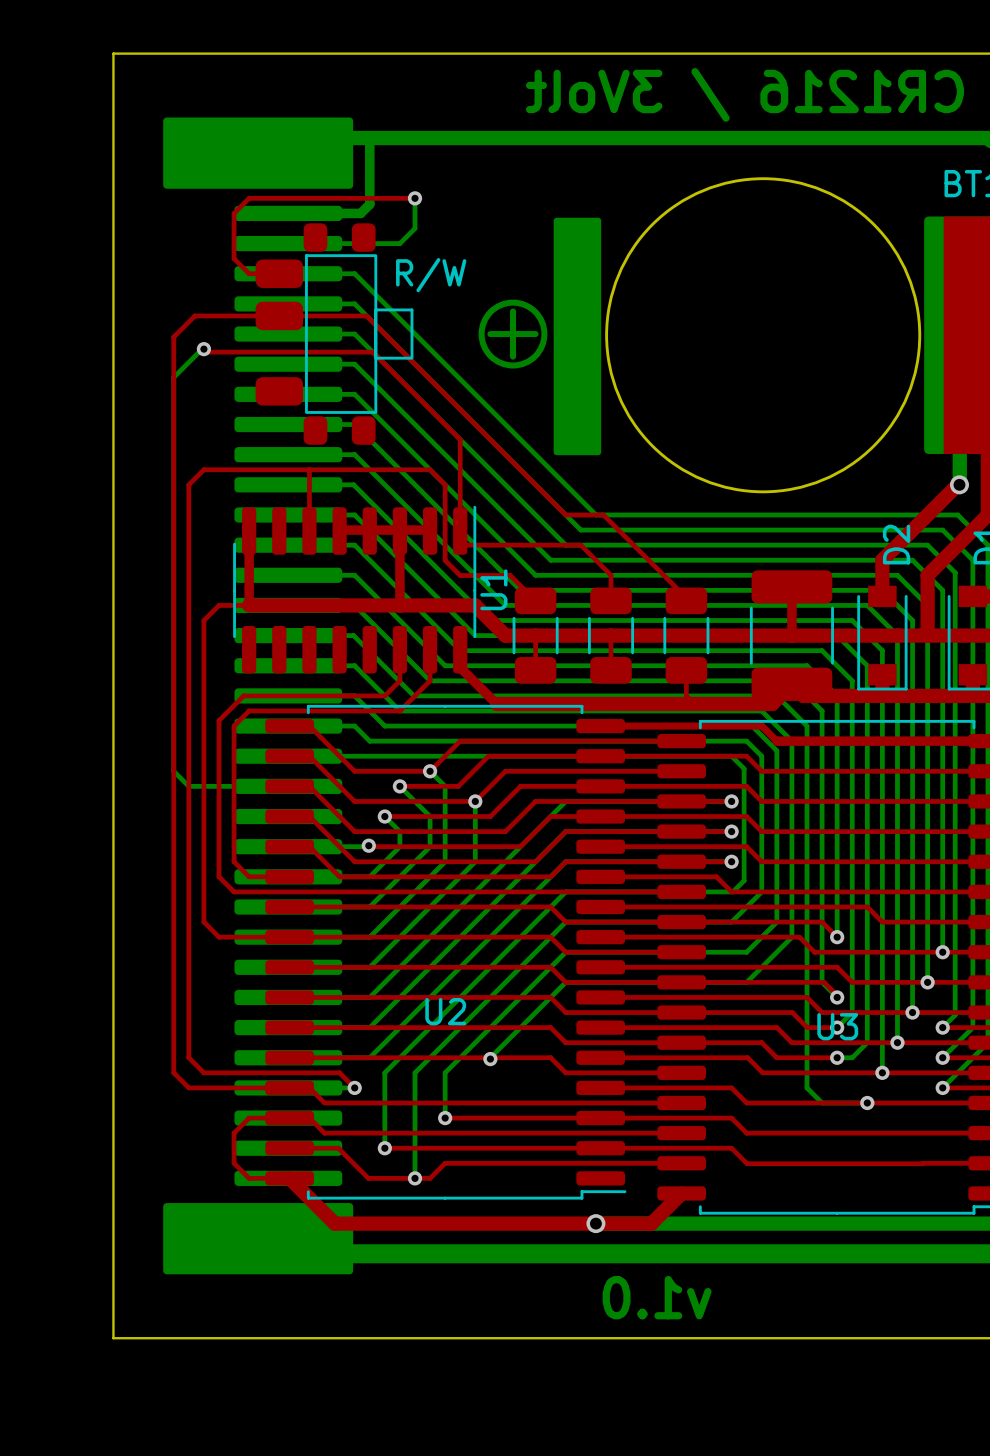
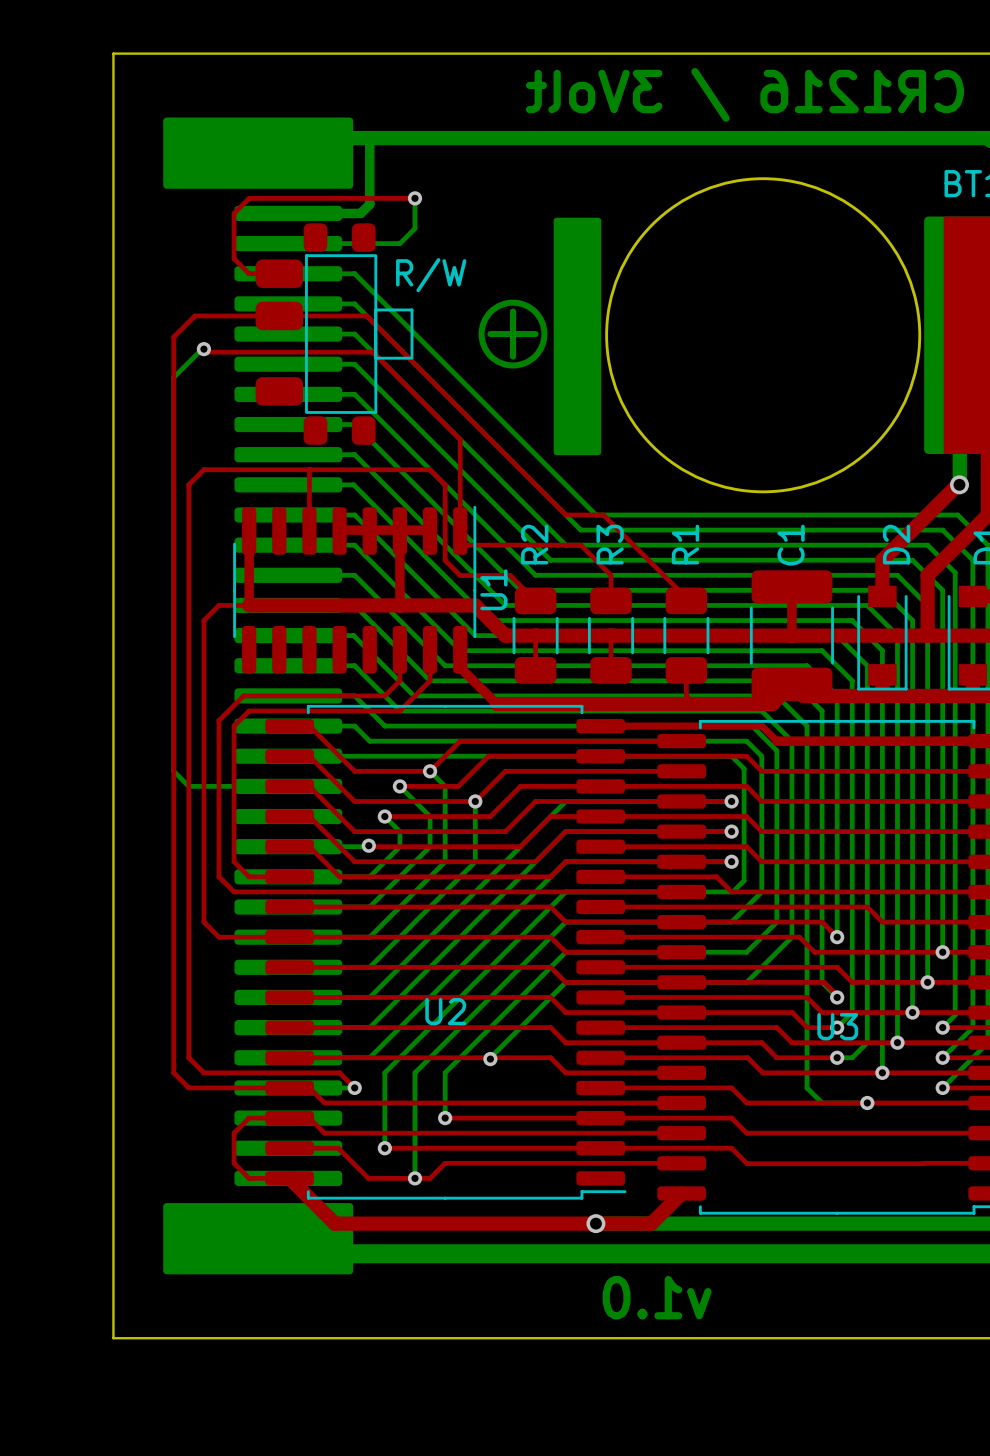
R2 name: none -> R2 (534, 544)
R3 name: none -> R3 (610, 544)
R1 name: none -> R1 (685, 544)
C1 name: none -> C1 (791, 545)

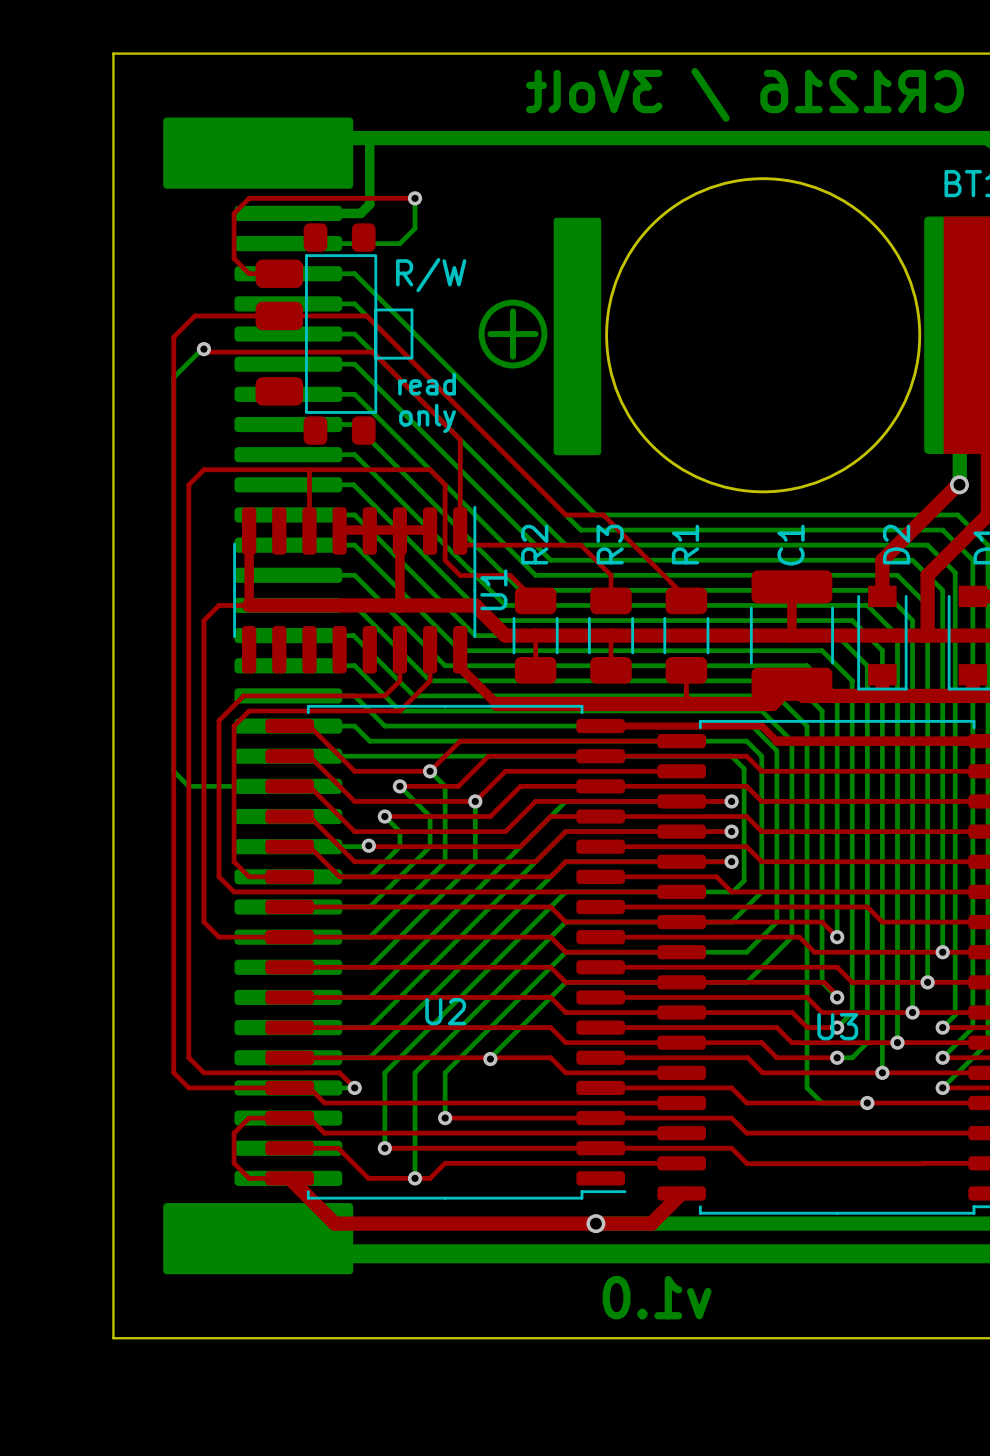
text: none -> read (427, 384)
text: none -> only (427, 418)

